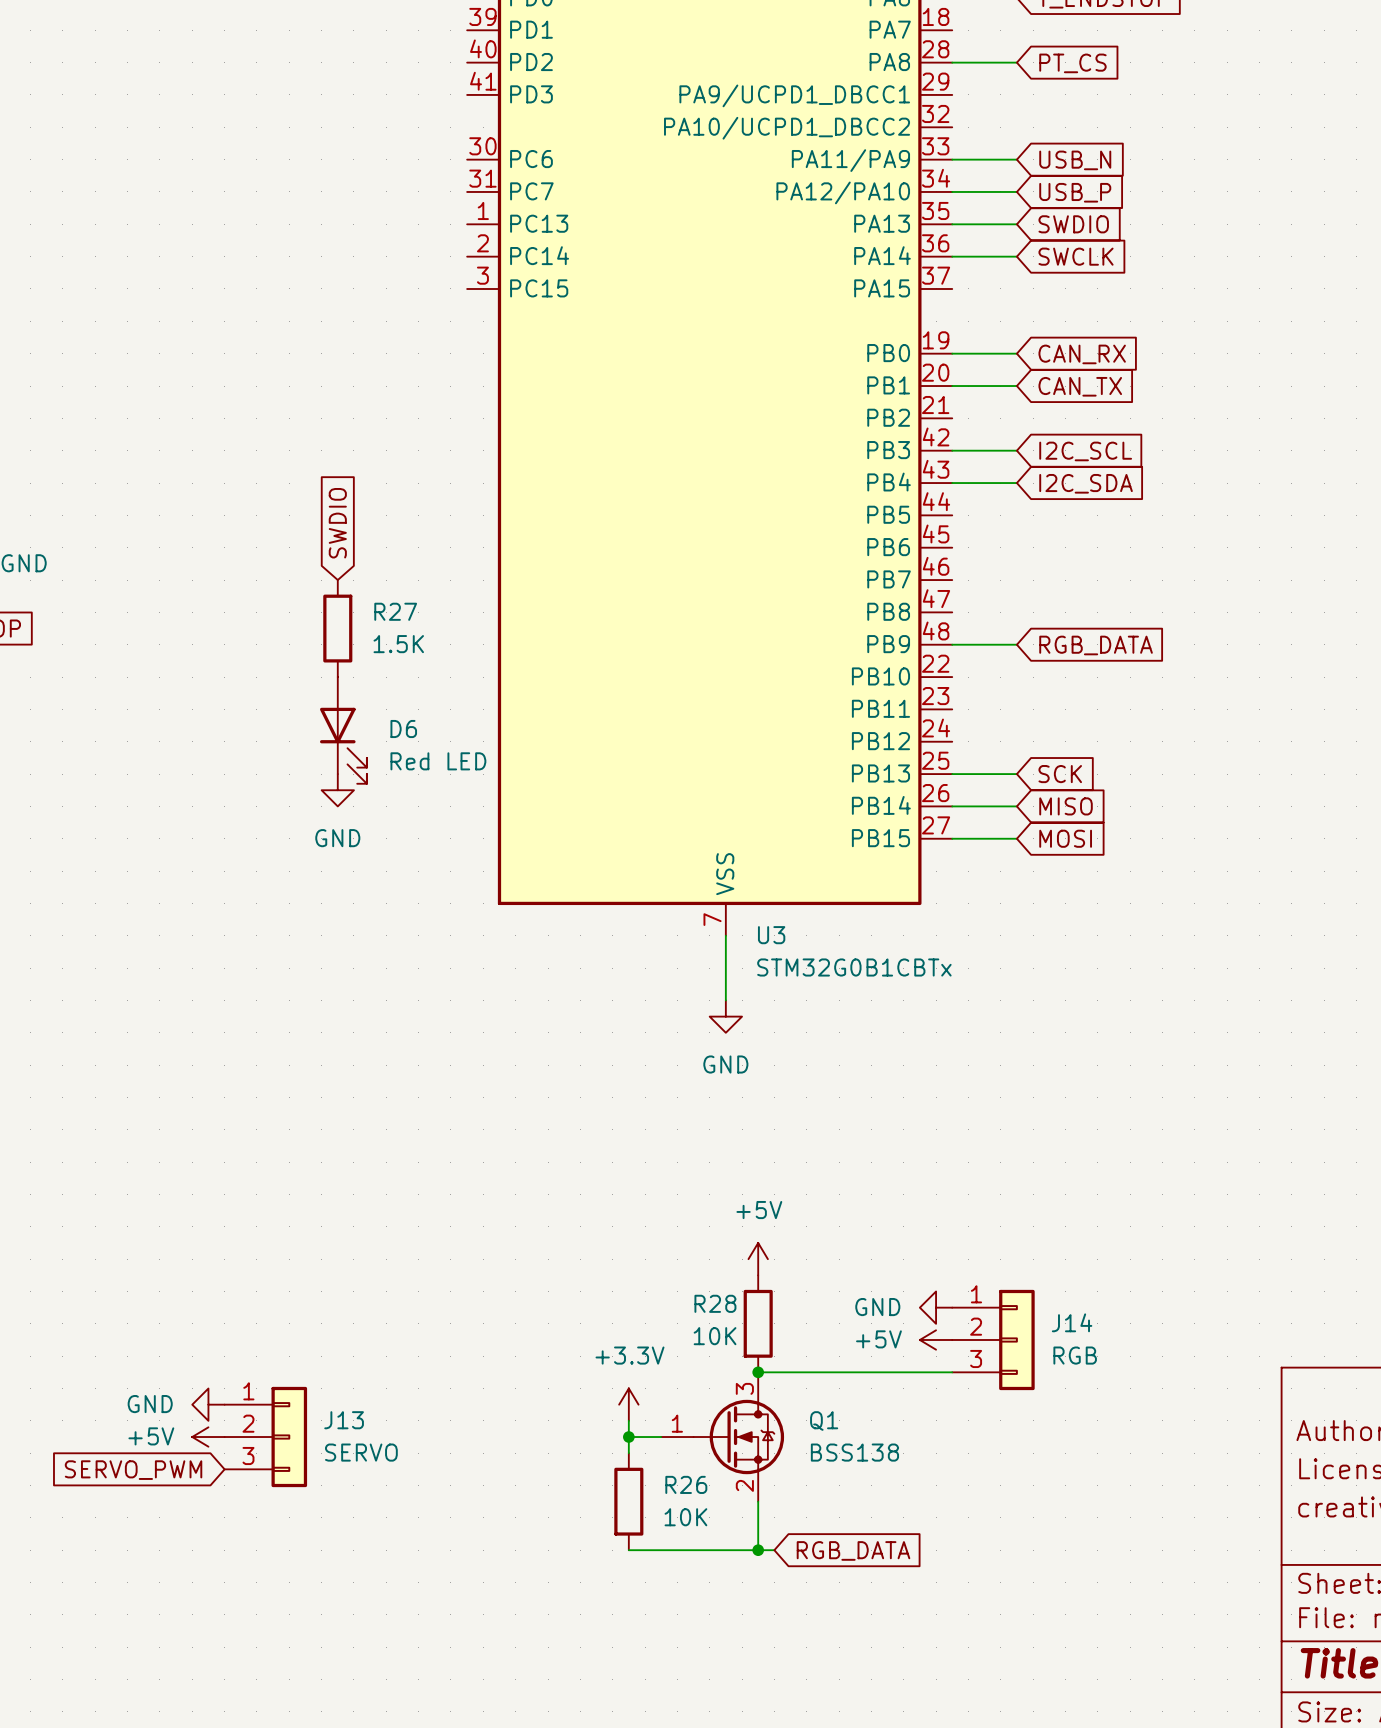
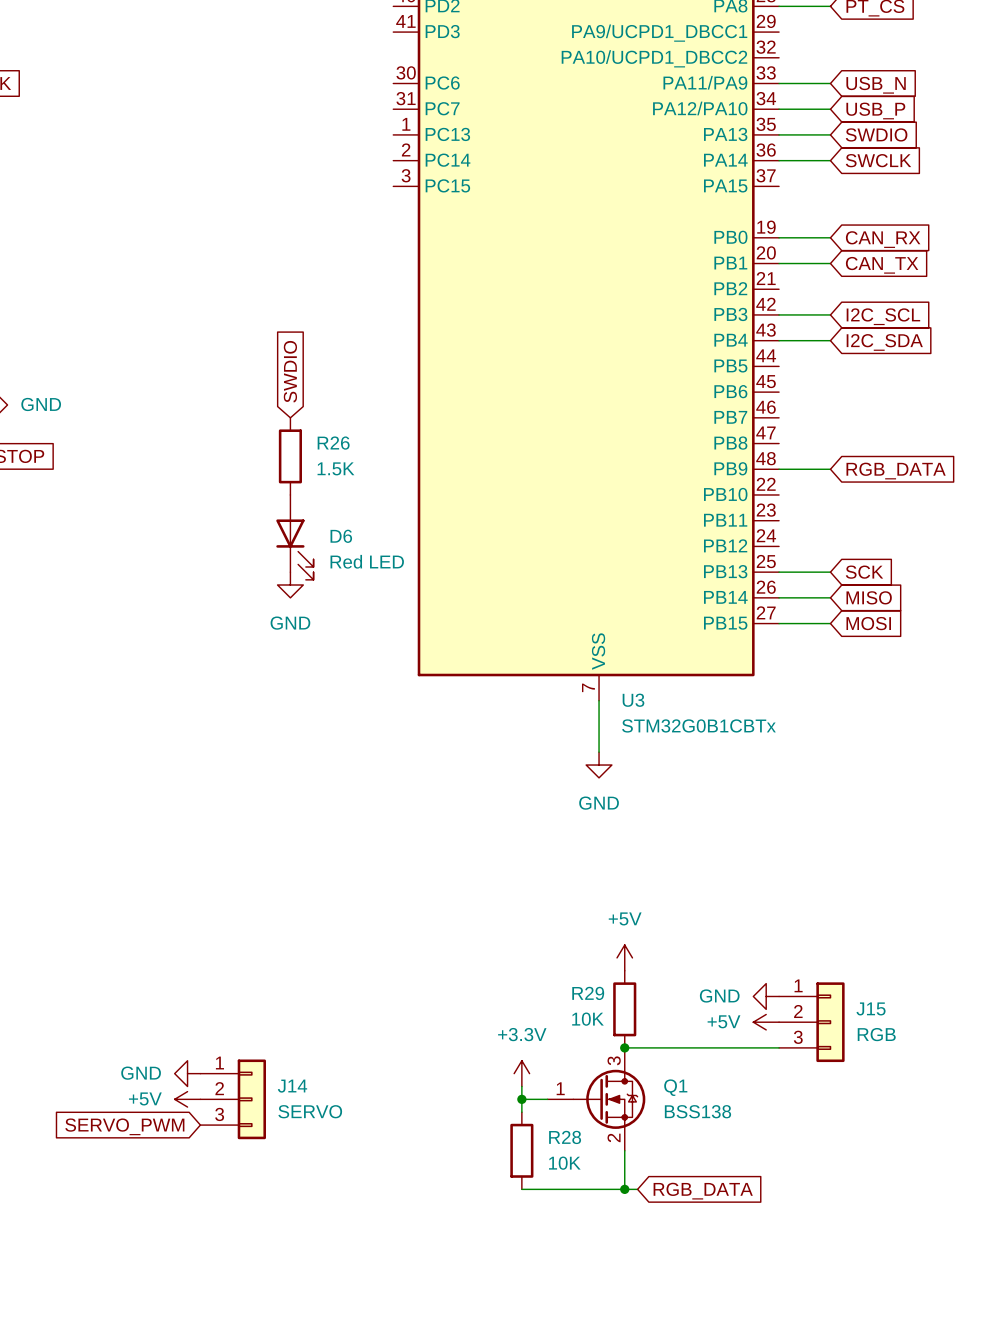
R27 name: R27 (395, 611) -> R26 (333, 443)
R28 name: R28 (715, 1303) -> R29 (588, 993)
J14 name: J14 (1072, 1322) -> J15 (871, 1008)
J13 name: J13 (344, 1420) -> J14 (292, 1086)
R26 name: R26 (686, 1484) -> R28 (565, 1137)

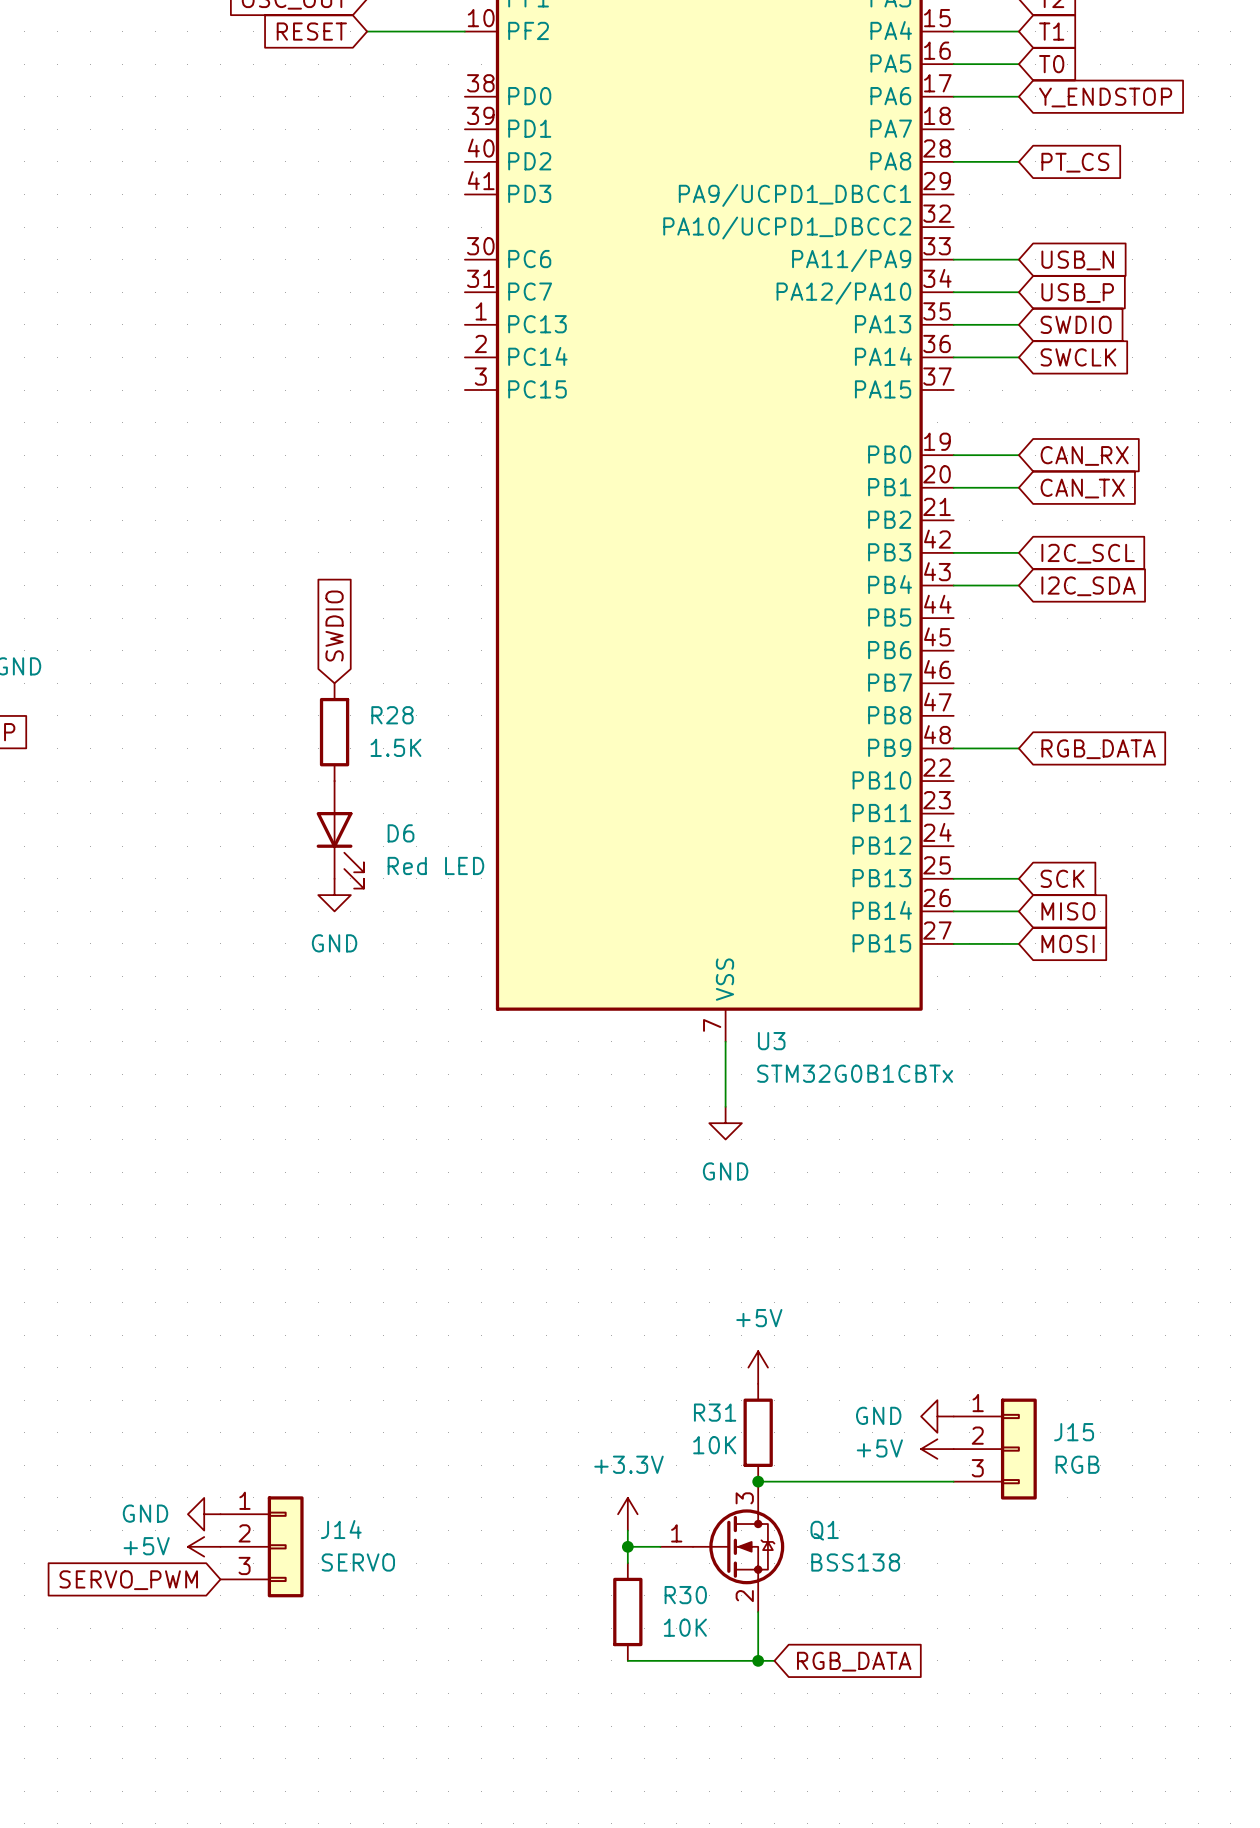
R26 name: R26 (333, 443) -> R28 (392, 715)
R29 name: R29 (588, 993) -> R31 (715, 1412)
R28 name: R28 (565, 1137) -> R30 (685, 1595)

